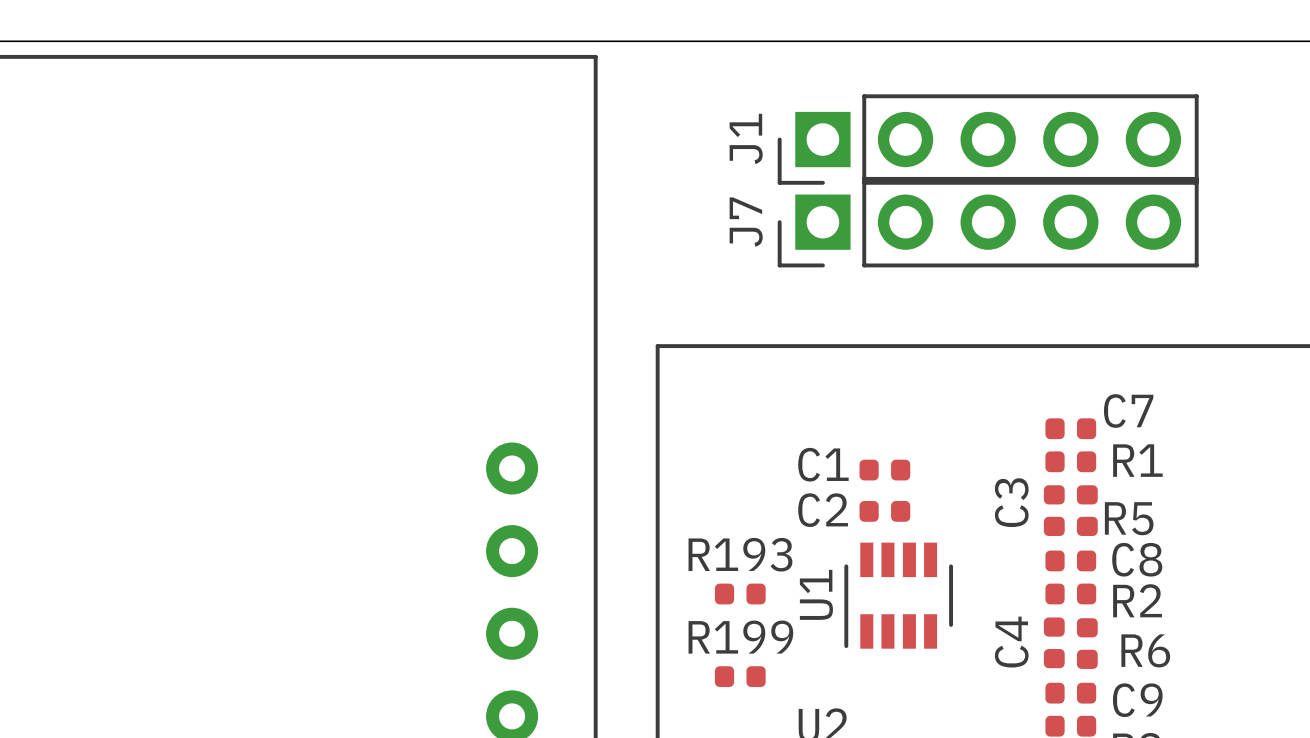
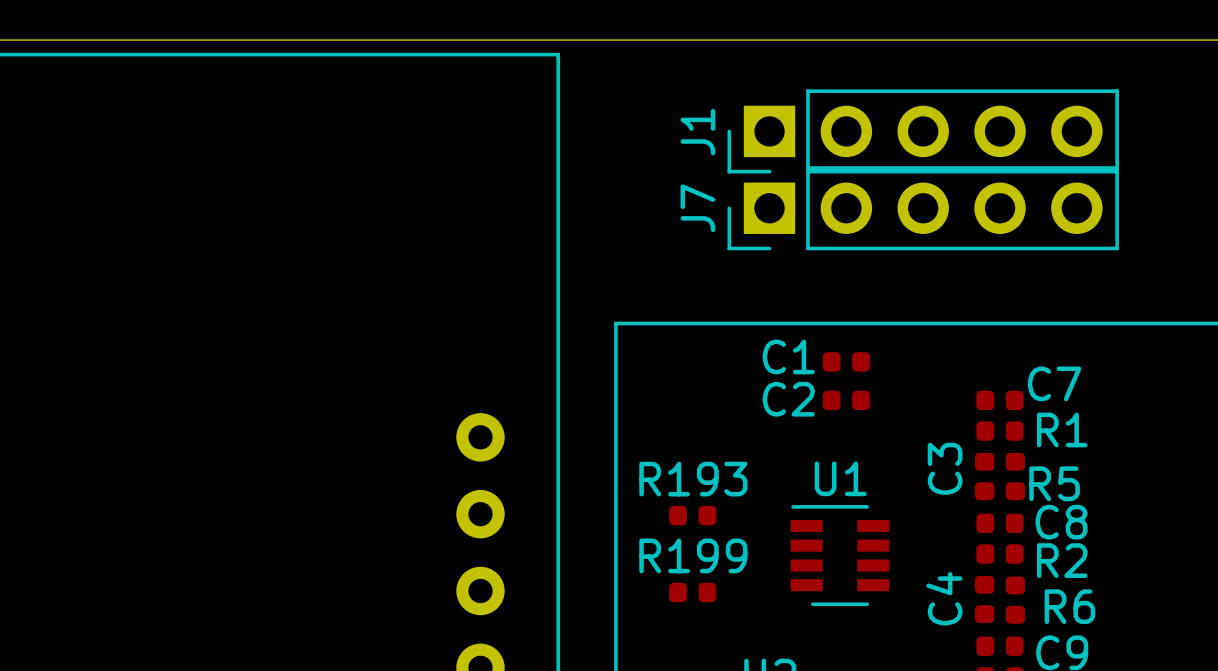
C1 position: (884, 470) -> (846, 361)
C2 position: (884, 511) -> (846, 400)
R193 position: (740, 594) -> (692, 515)
U1 rotation: 0° (898, 595) -> 90° clockwise (840, 555)
R199 position: (740, 676) -> (692, 592)

